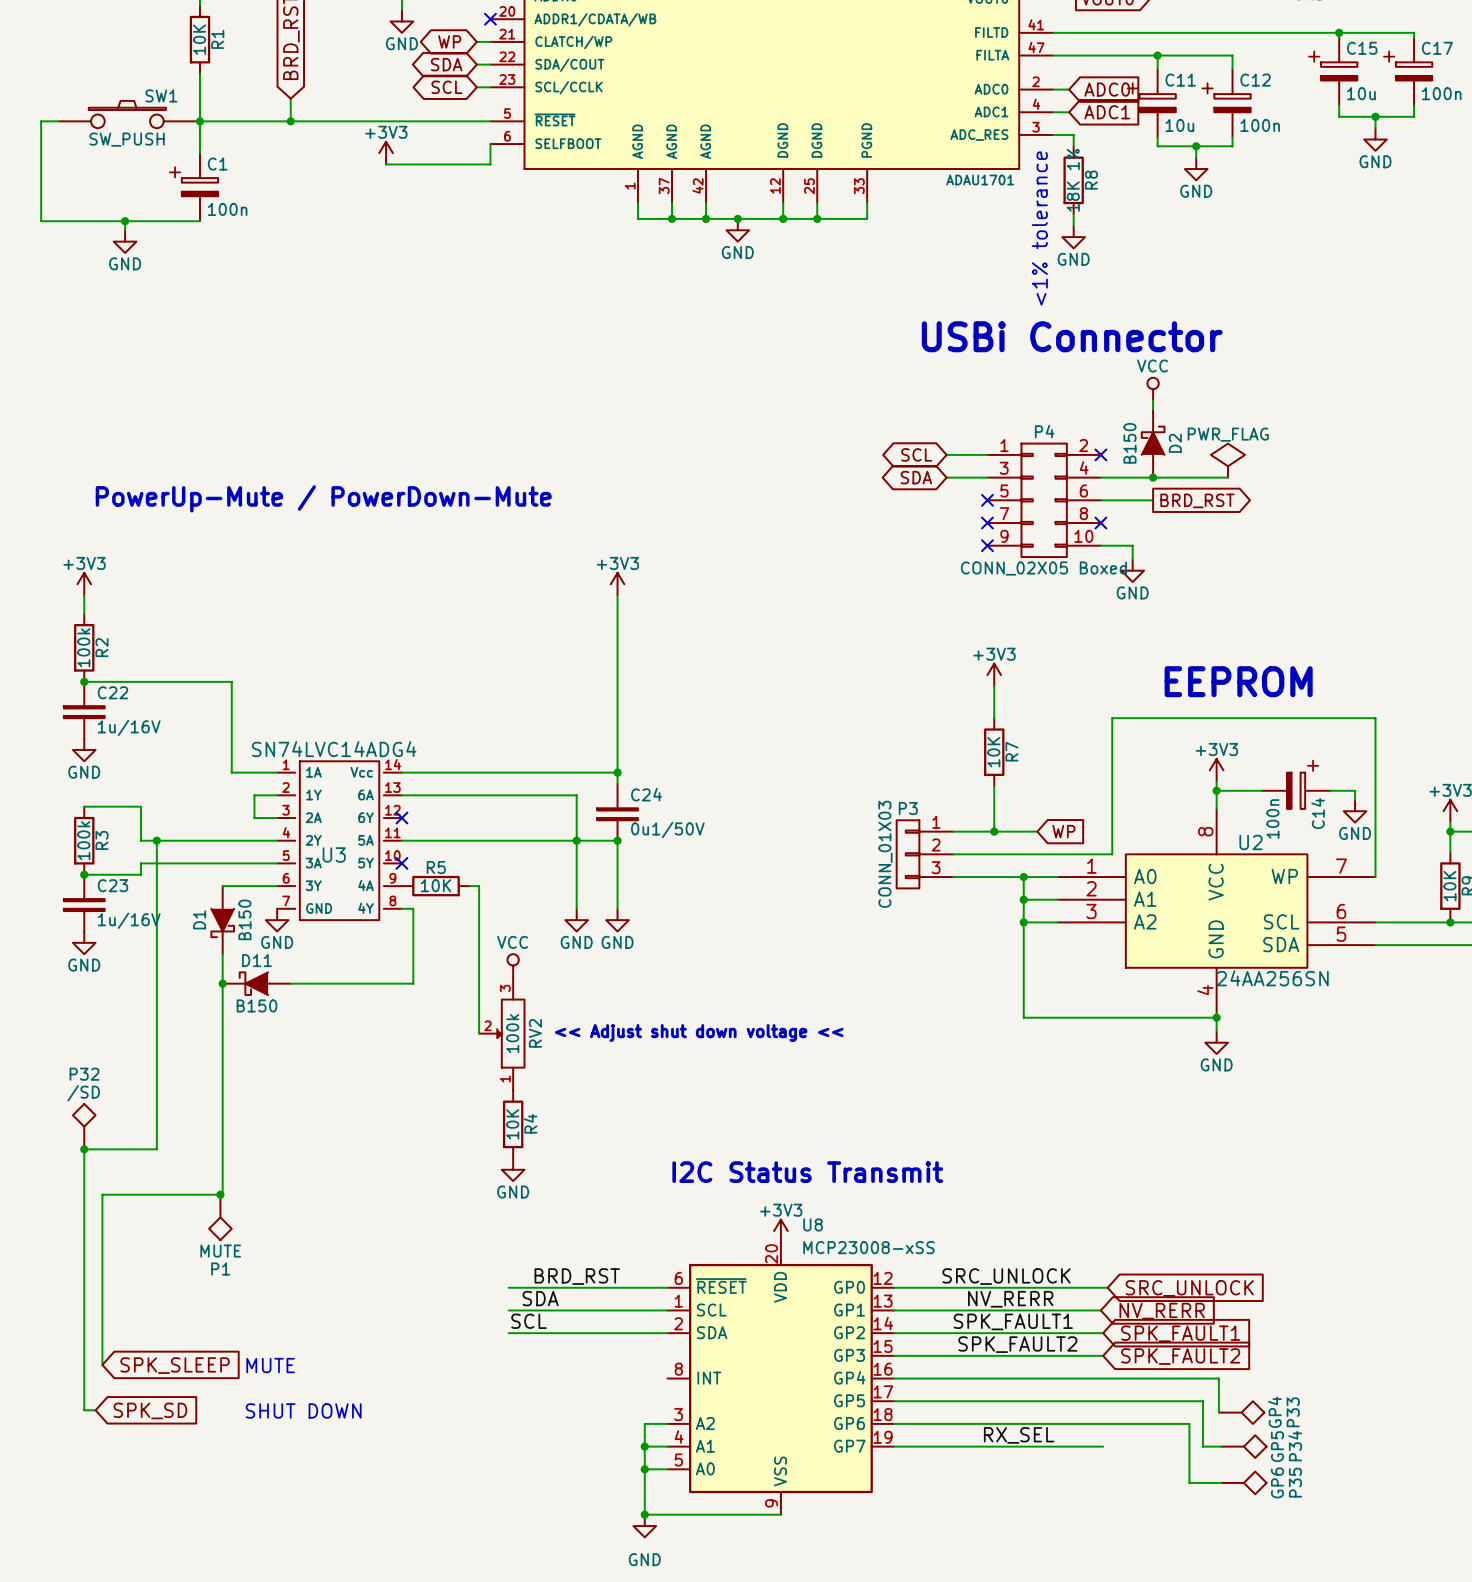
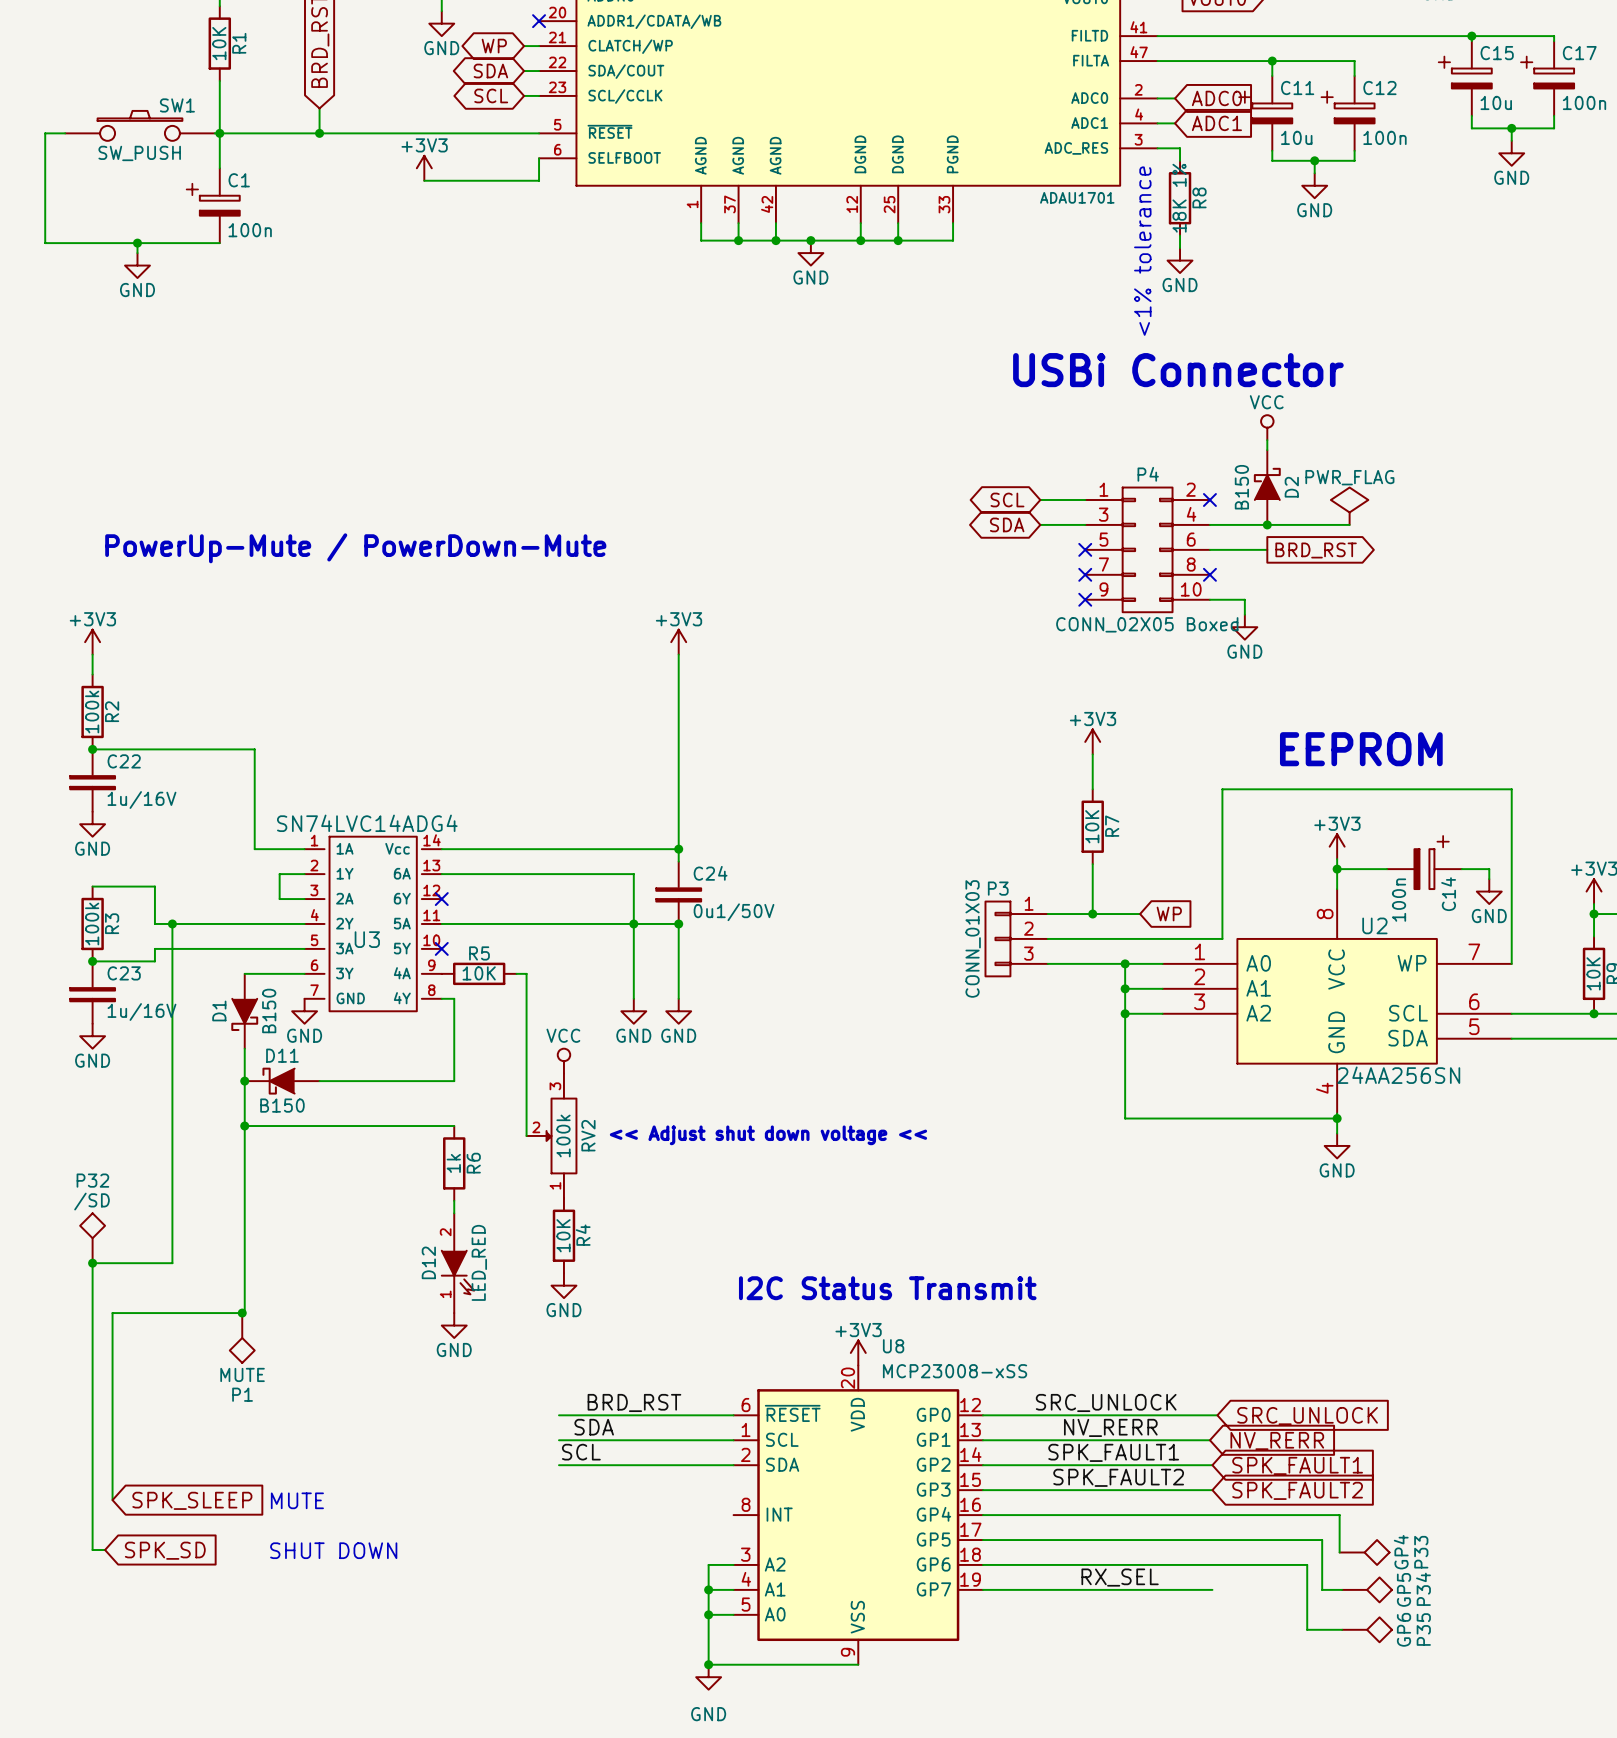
wire: none -> (244, 1126) (454, 1126)
junction: none -> (244, 1126)
R6: none -> 1k (454, 1163)
wire: none -> (454, 1200) (454, 1213)
D12: none -> LED_RED (457, 1263)
power symbol: none -> GND (454, 1325)

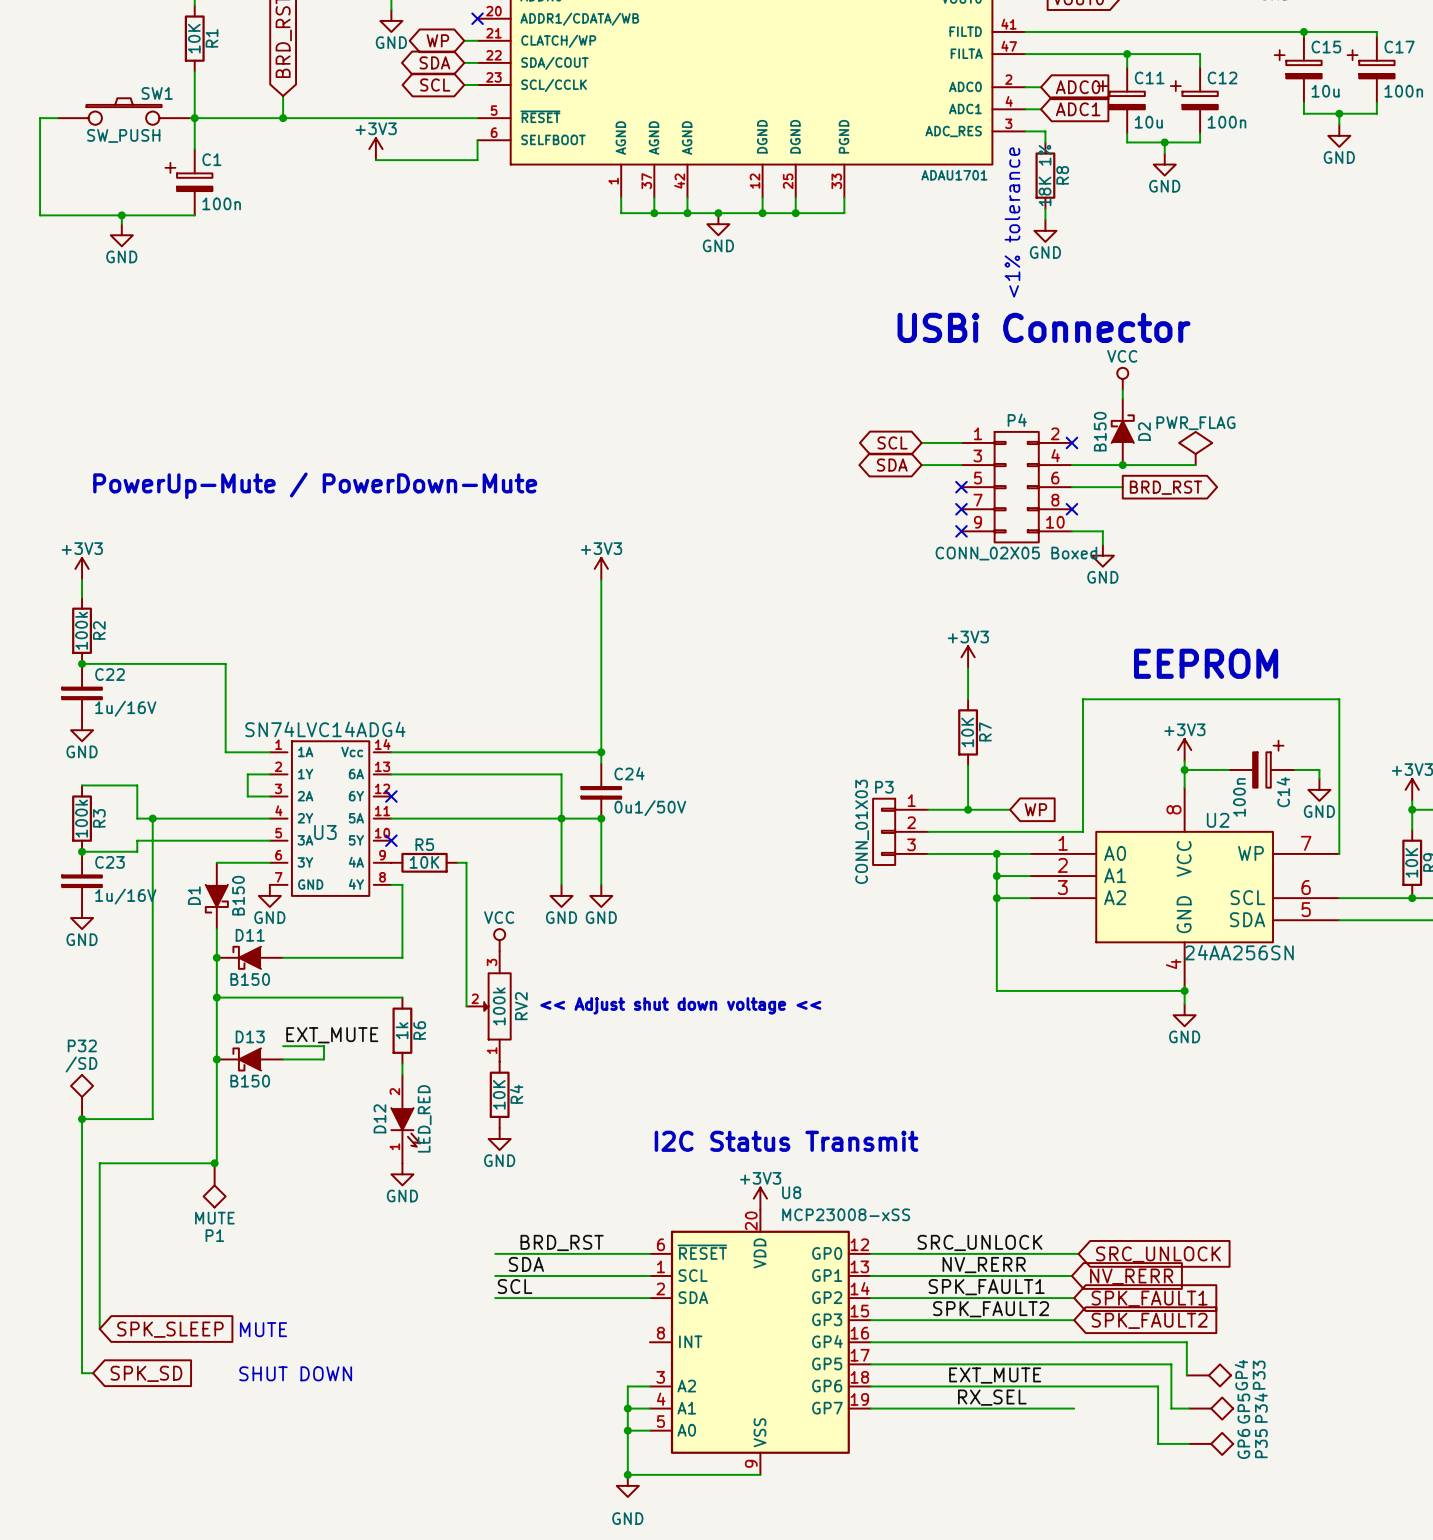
label: none -> EXT_MUTE (332, 1035)
wire: none -> (283, 1046) (323, 1046) (323, 1059) (283, 1059)
junction: none -> (216, 1059)
D13: none -> B150 (249, 1059)
label: none -> EXT_MUTE (995, 1375)

